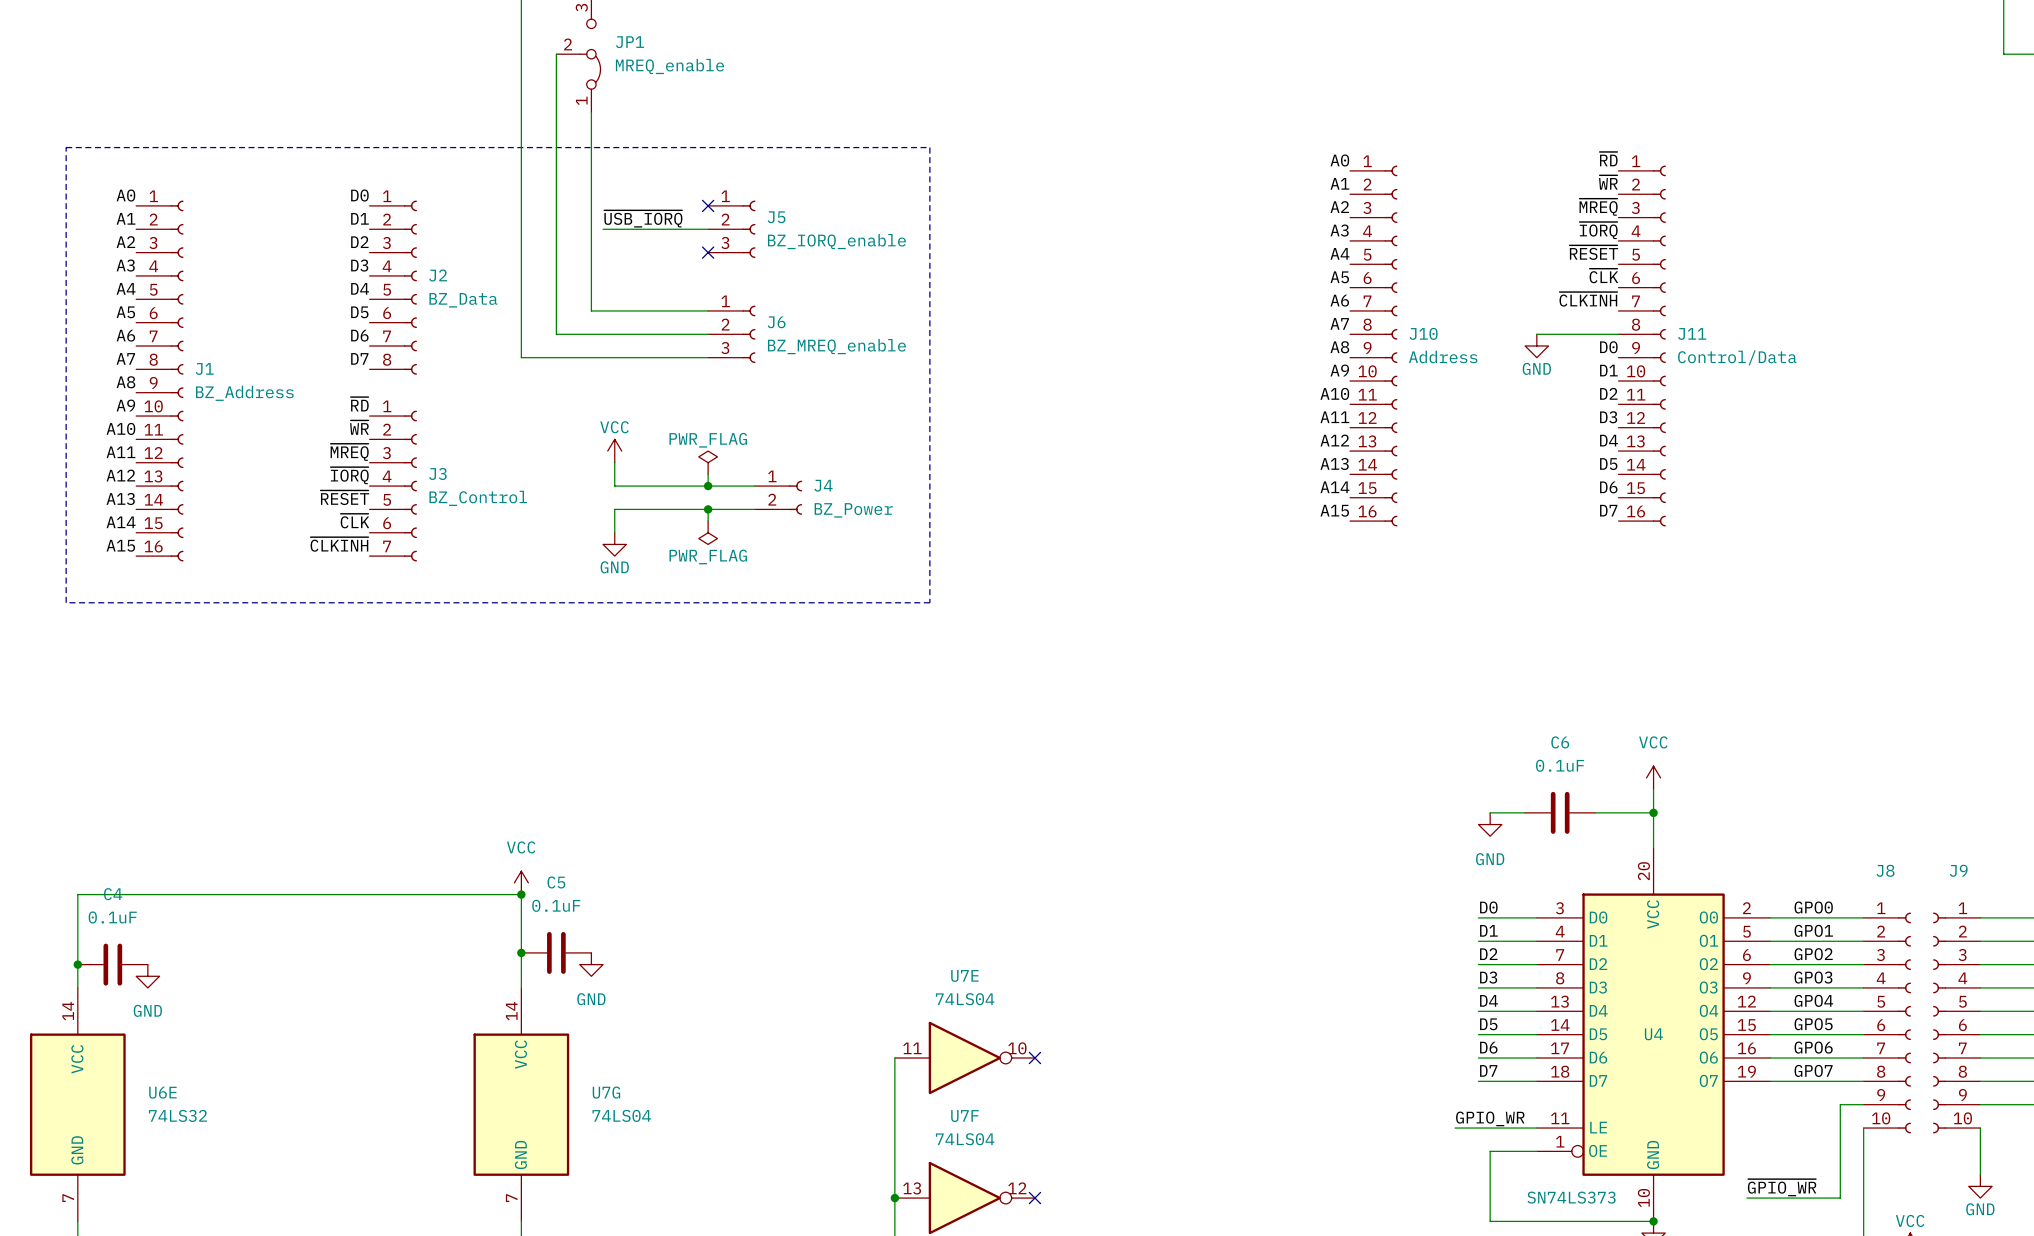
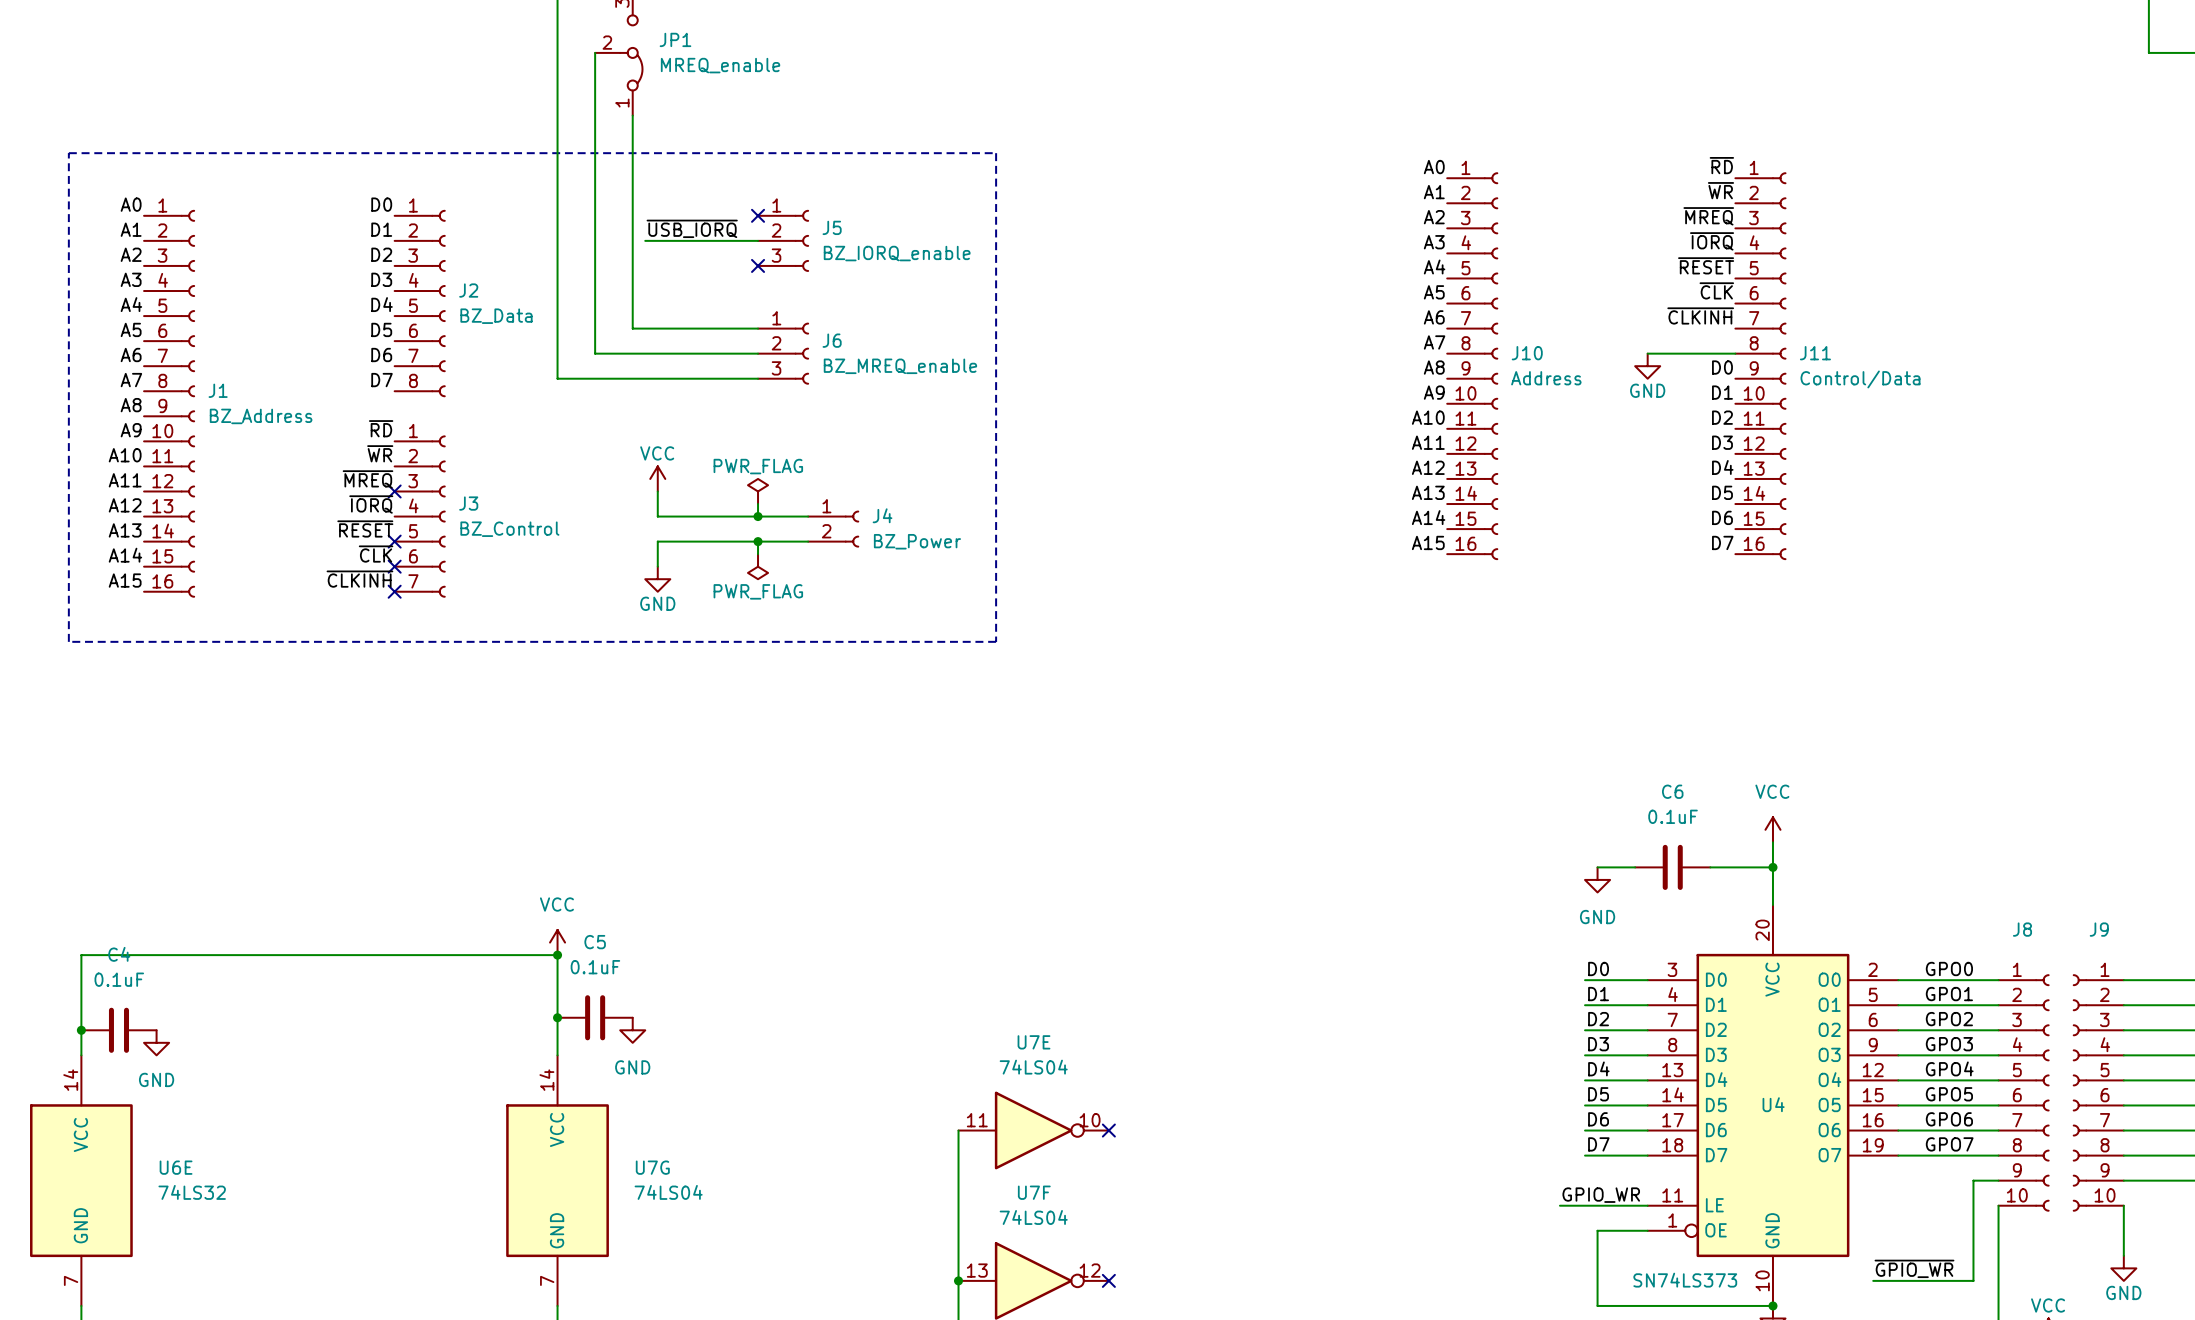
no-connect mark: none -> (394, 491)
no-connect mark: none -> (394, 541)
no-connect mark: none -> (394, 566)
no-connect mark: none -> (394, 591)

